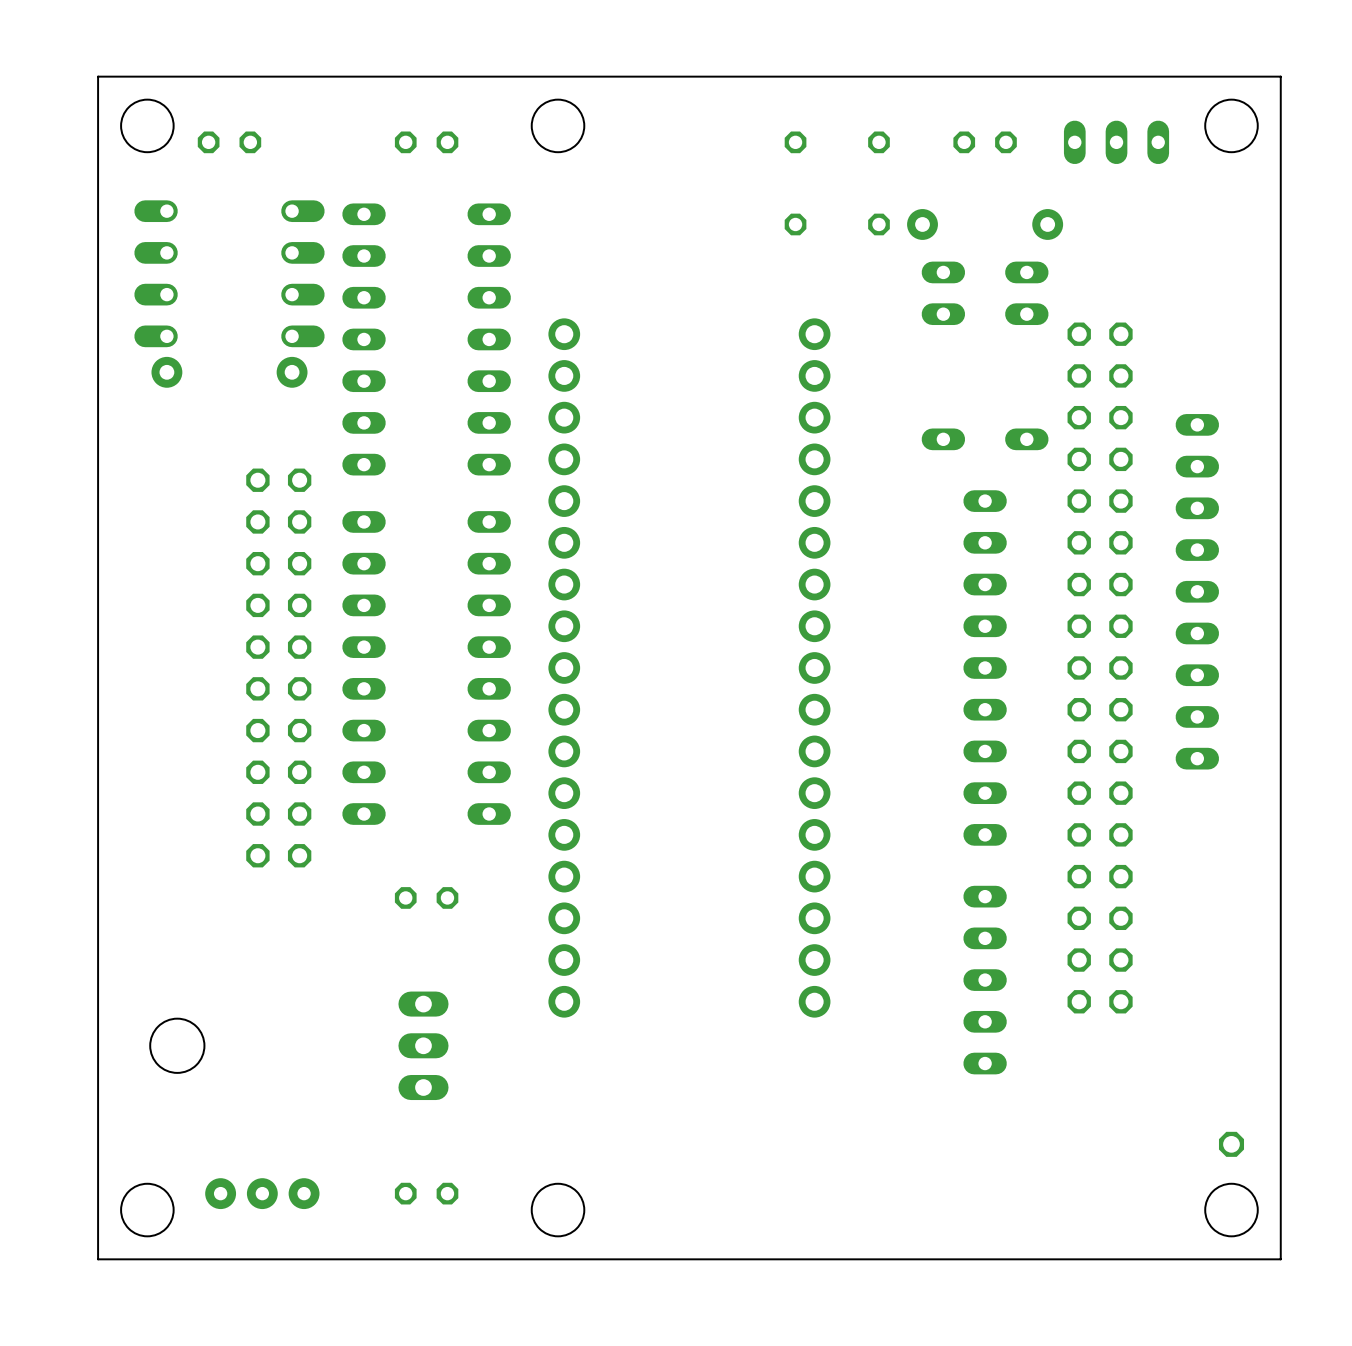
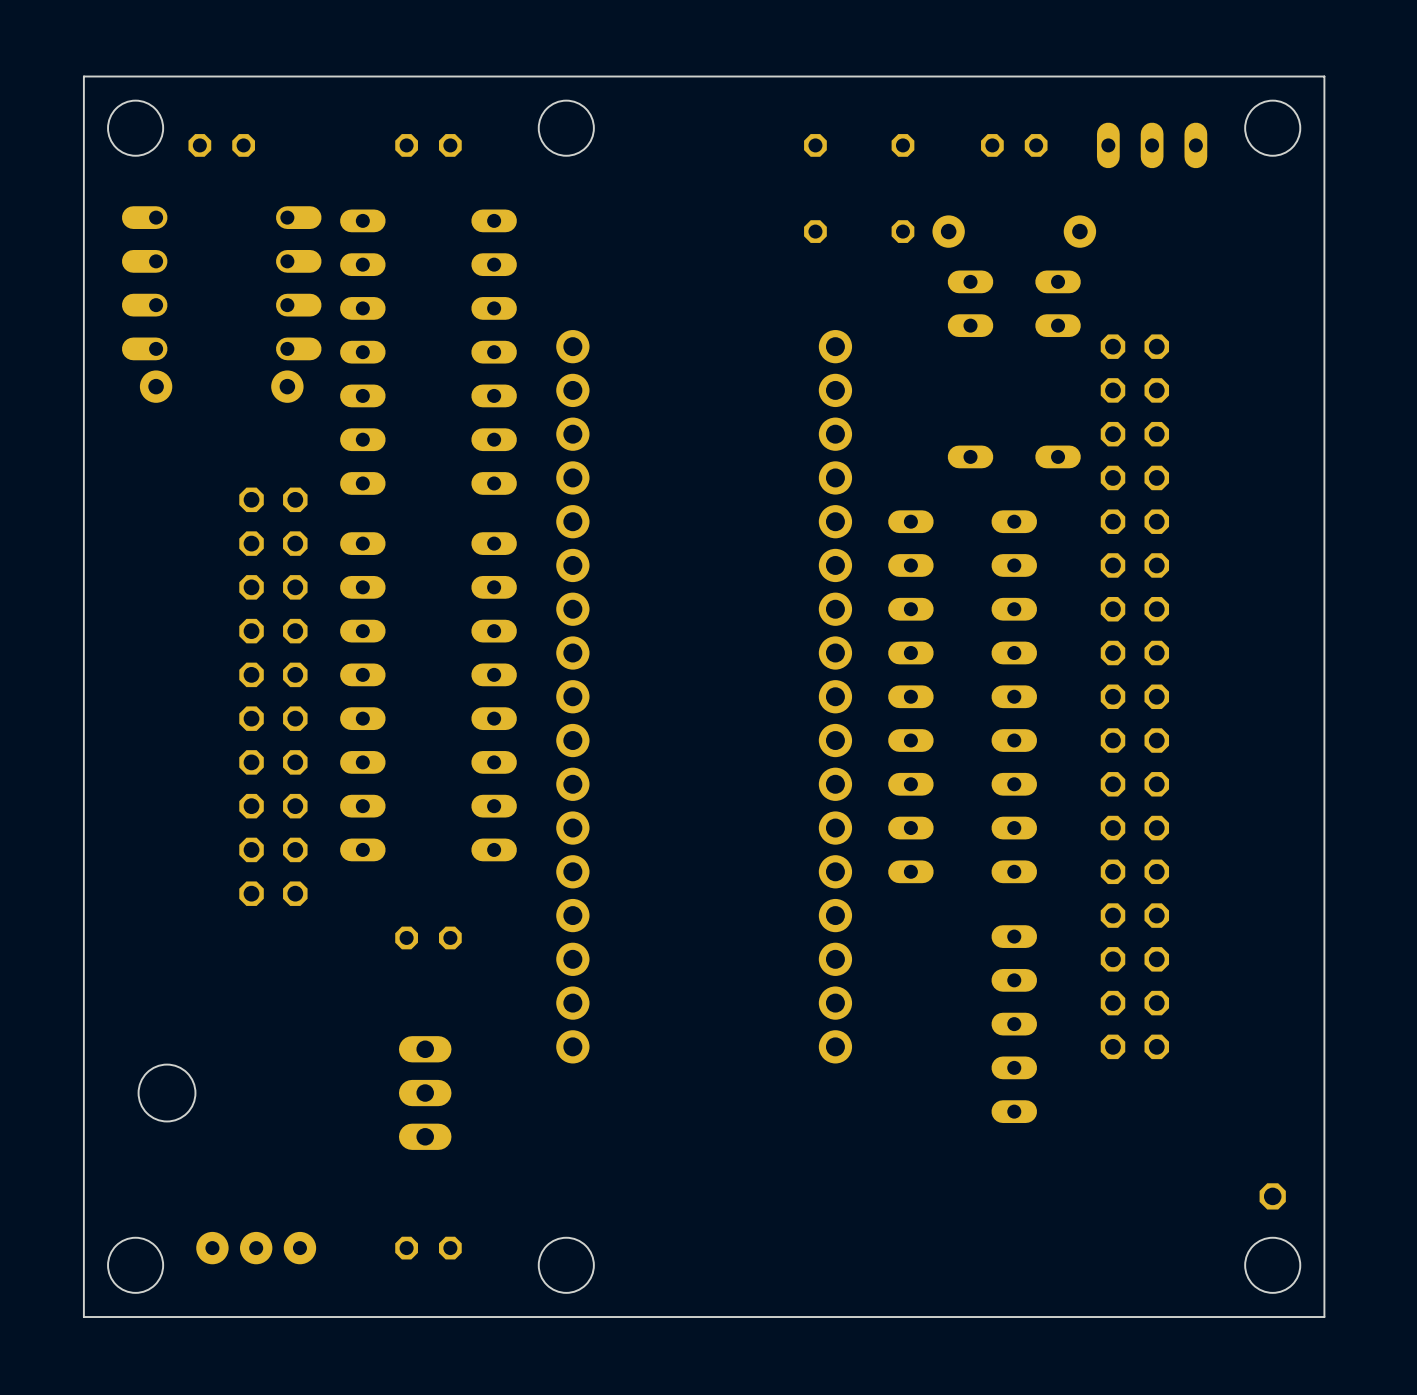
part position: (1197, 591) -> (910, 696)

